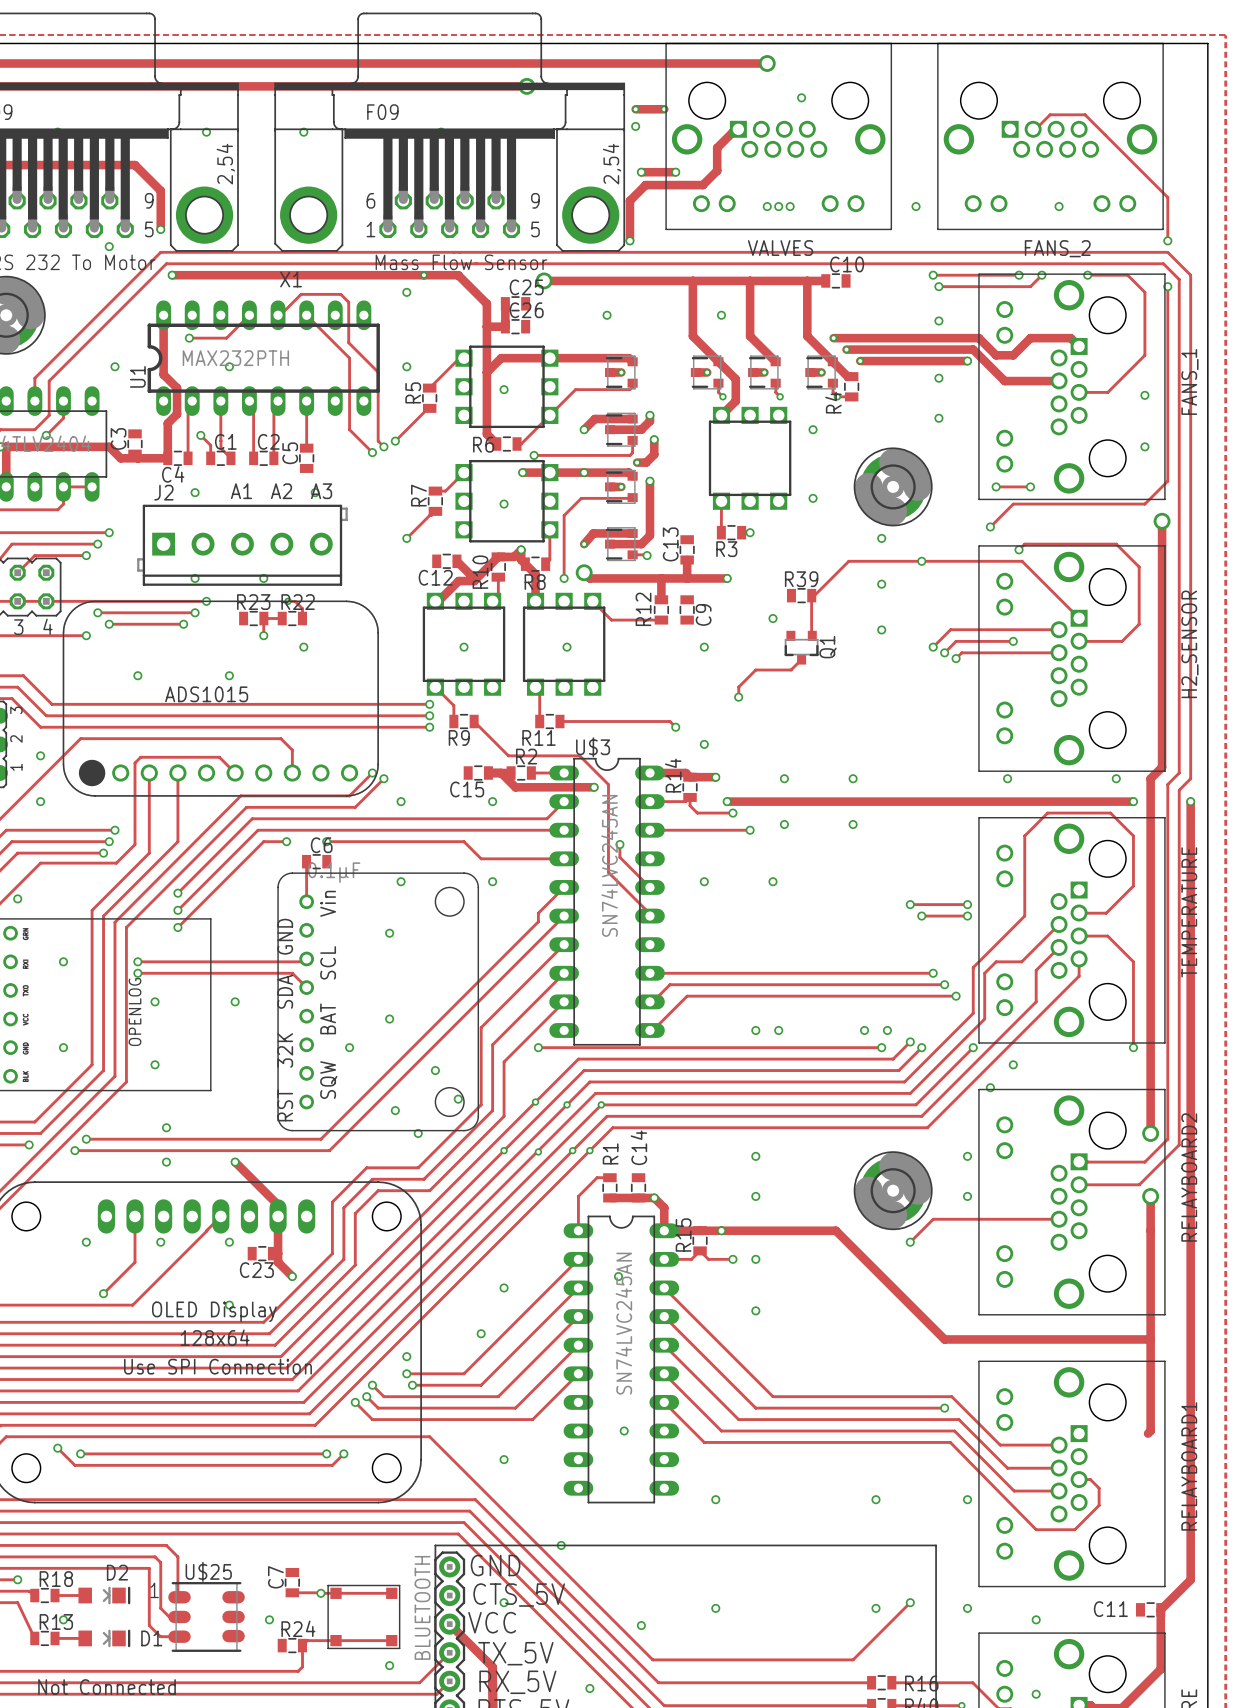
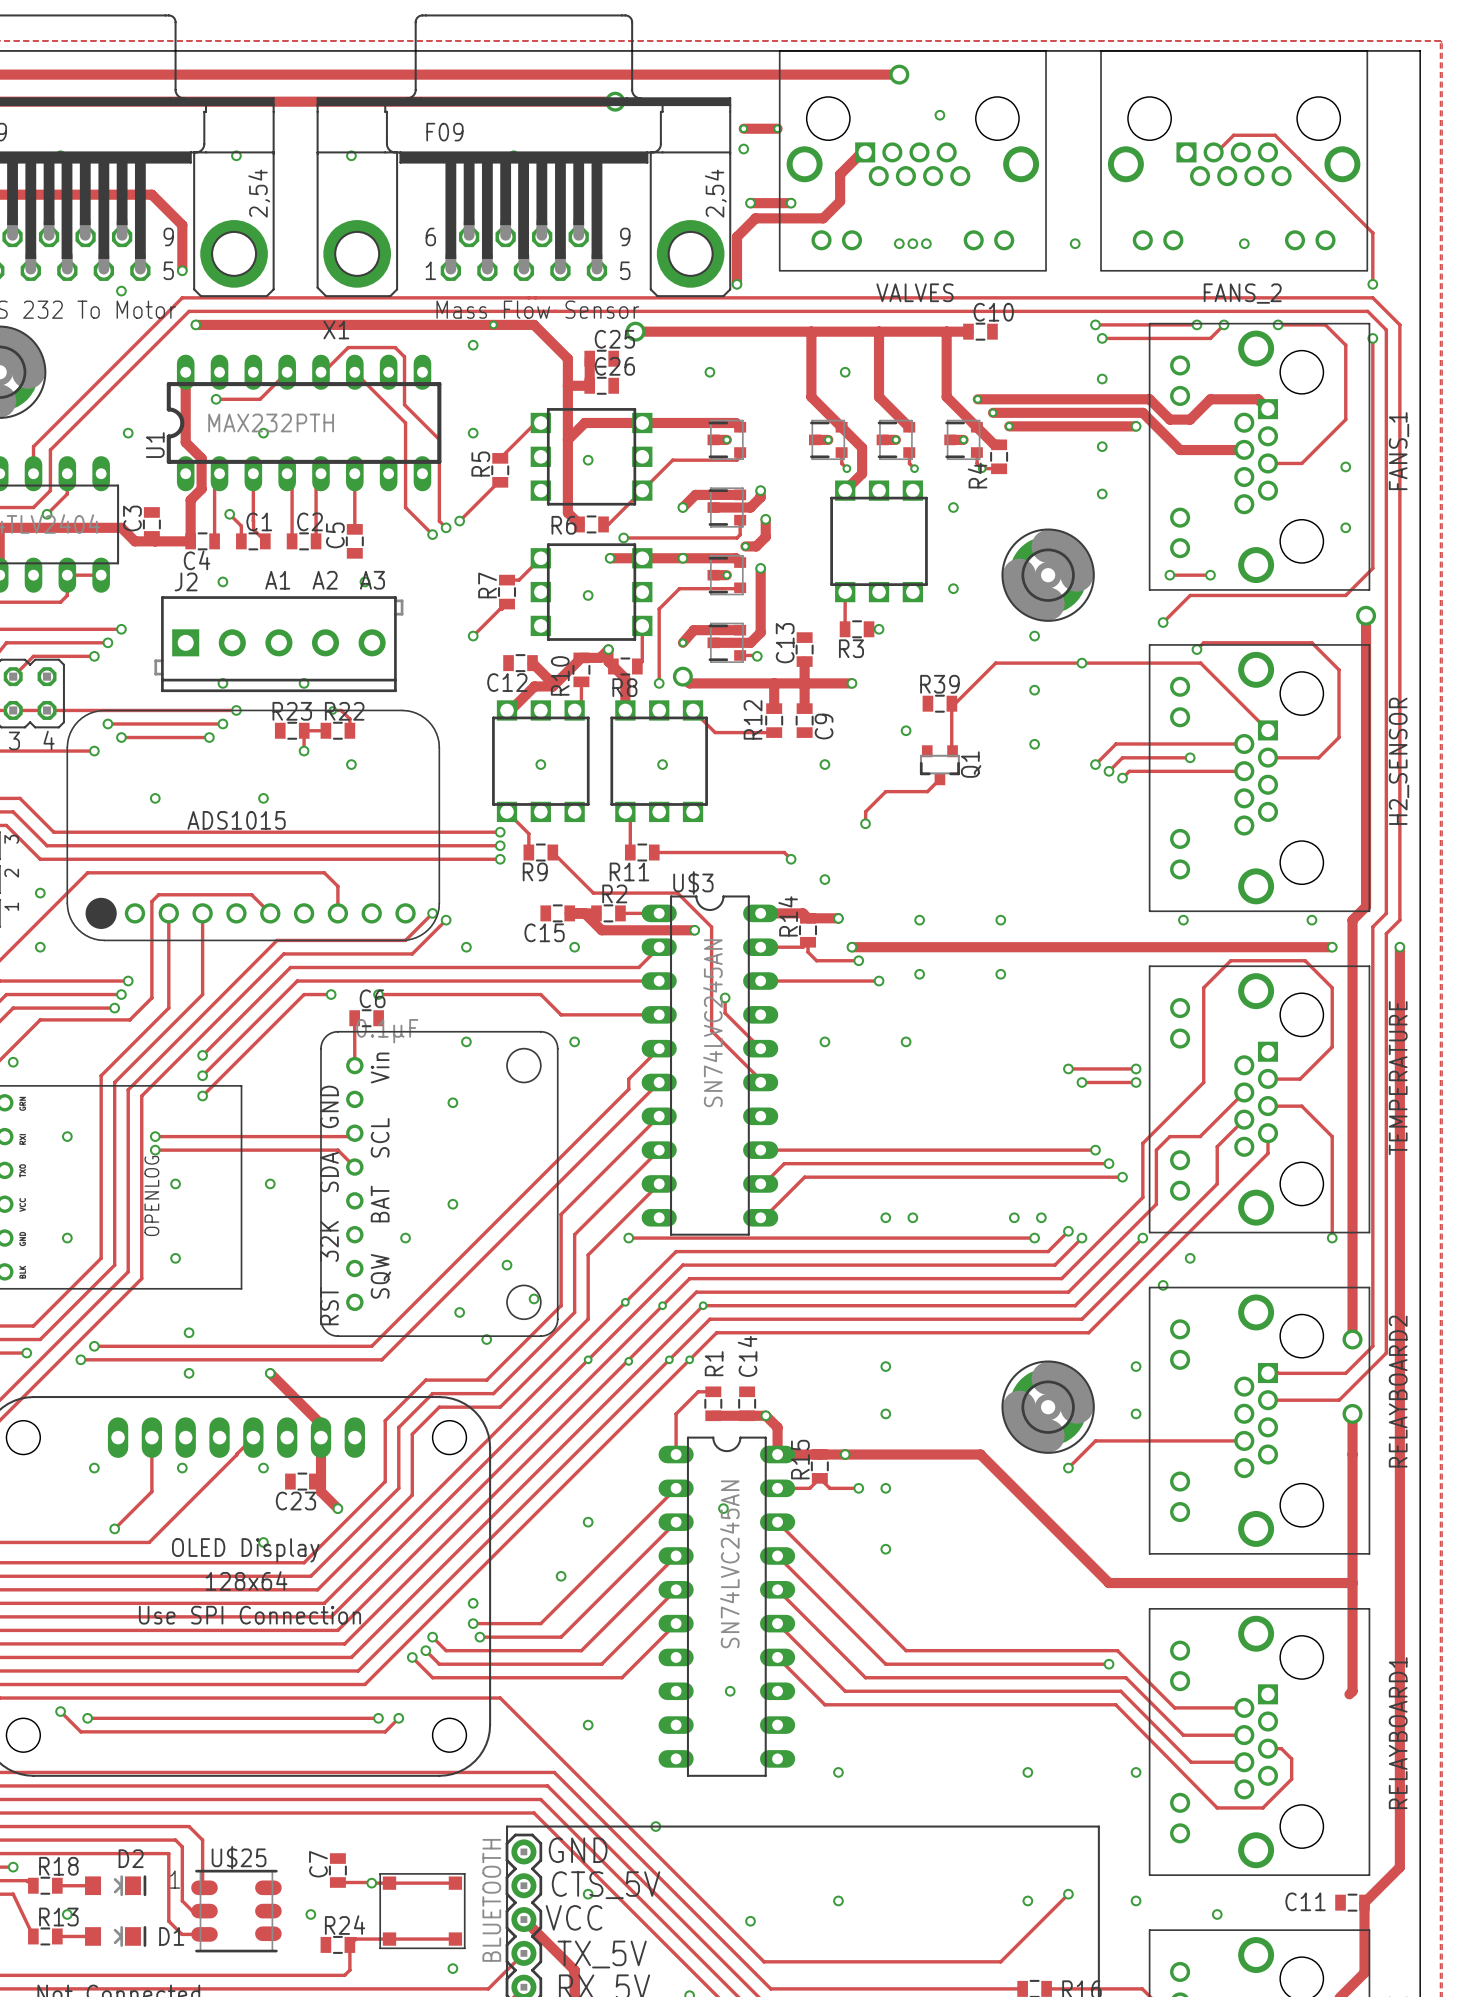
track: none -> (804, 683) (804, 708)

